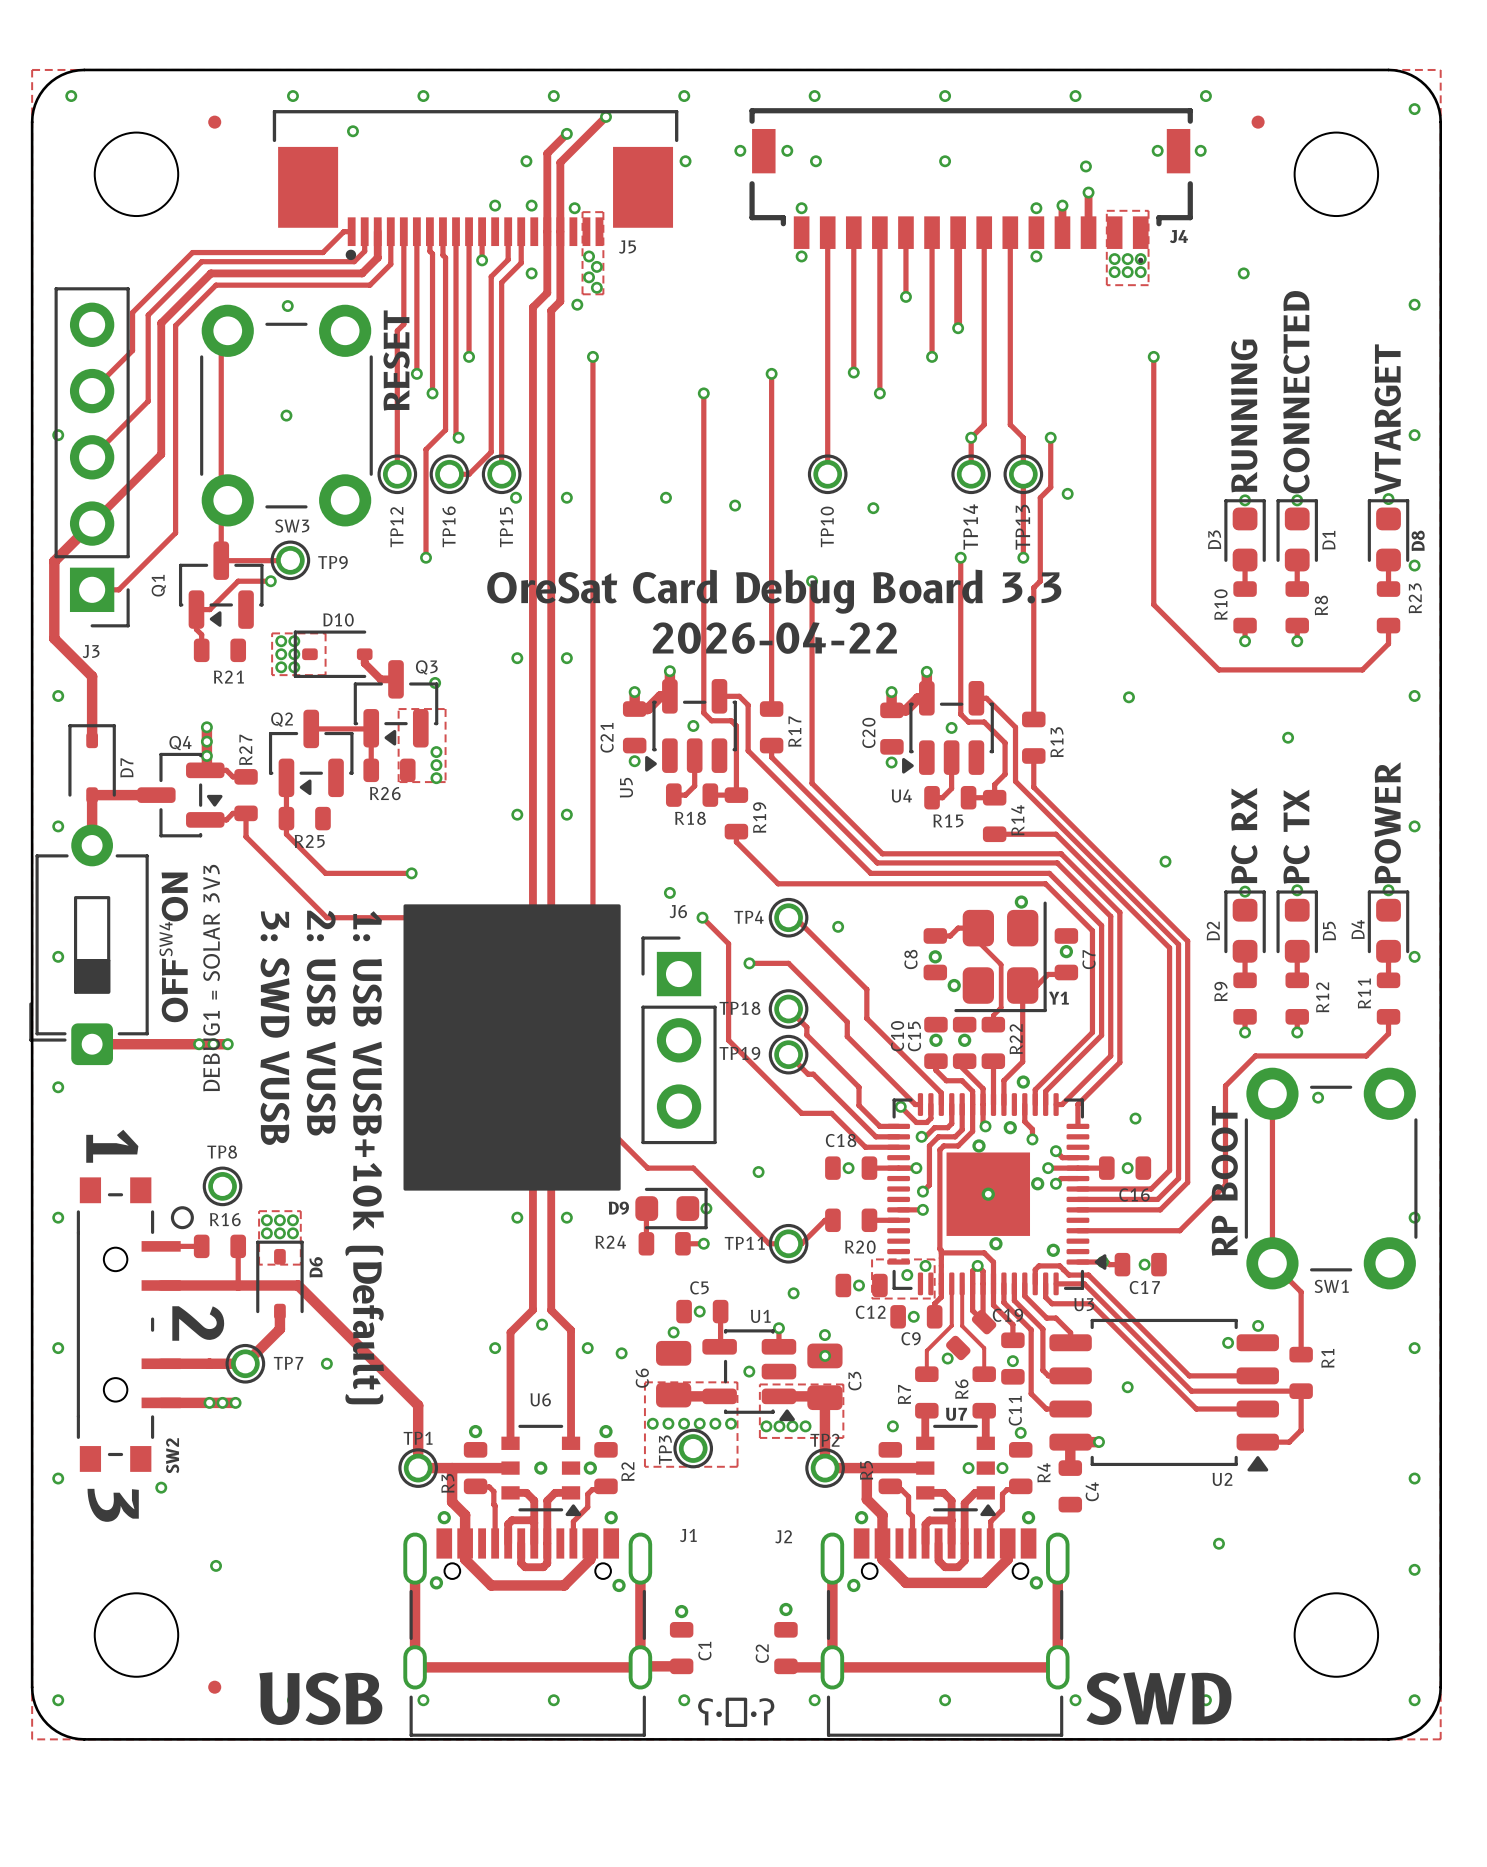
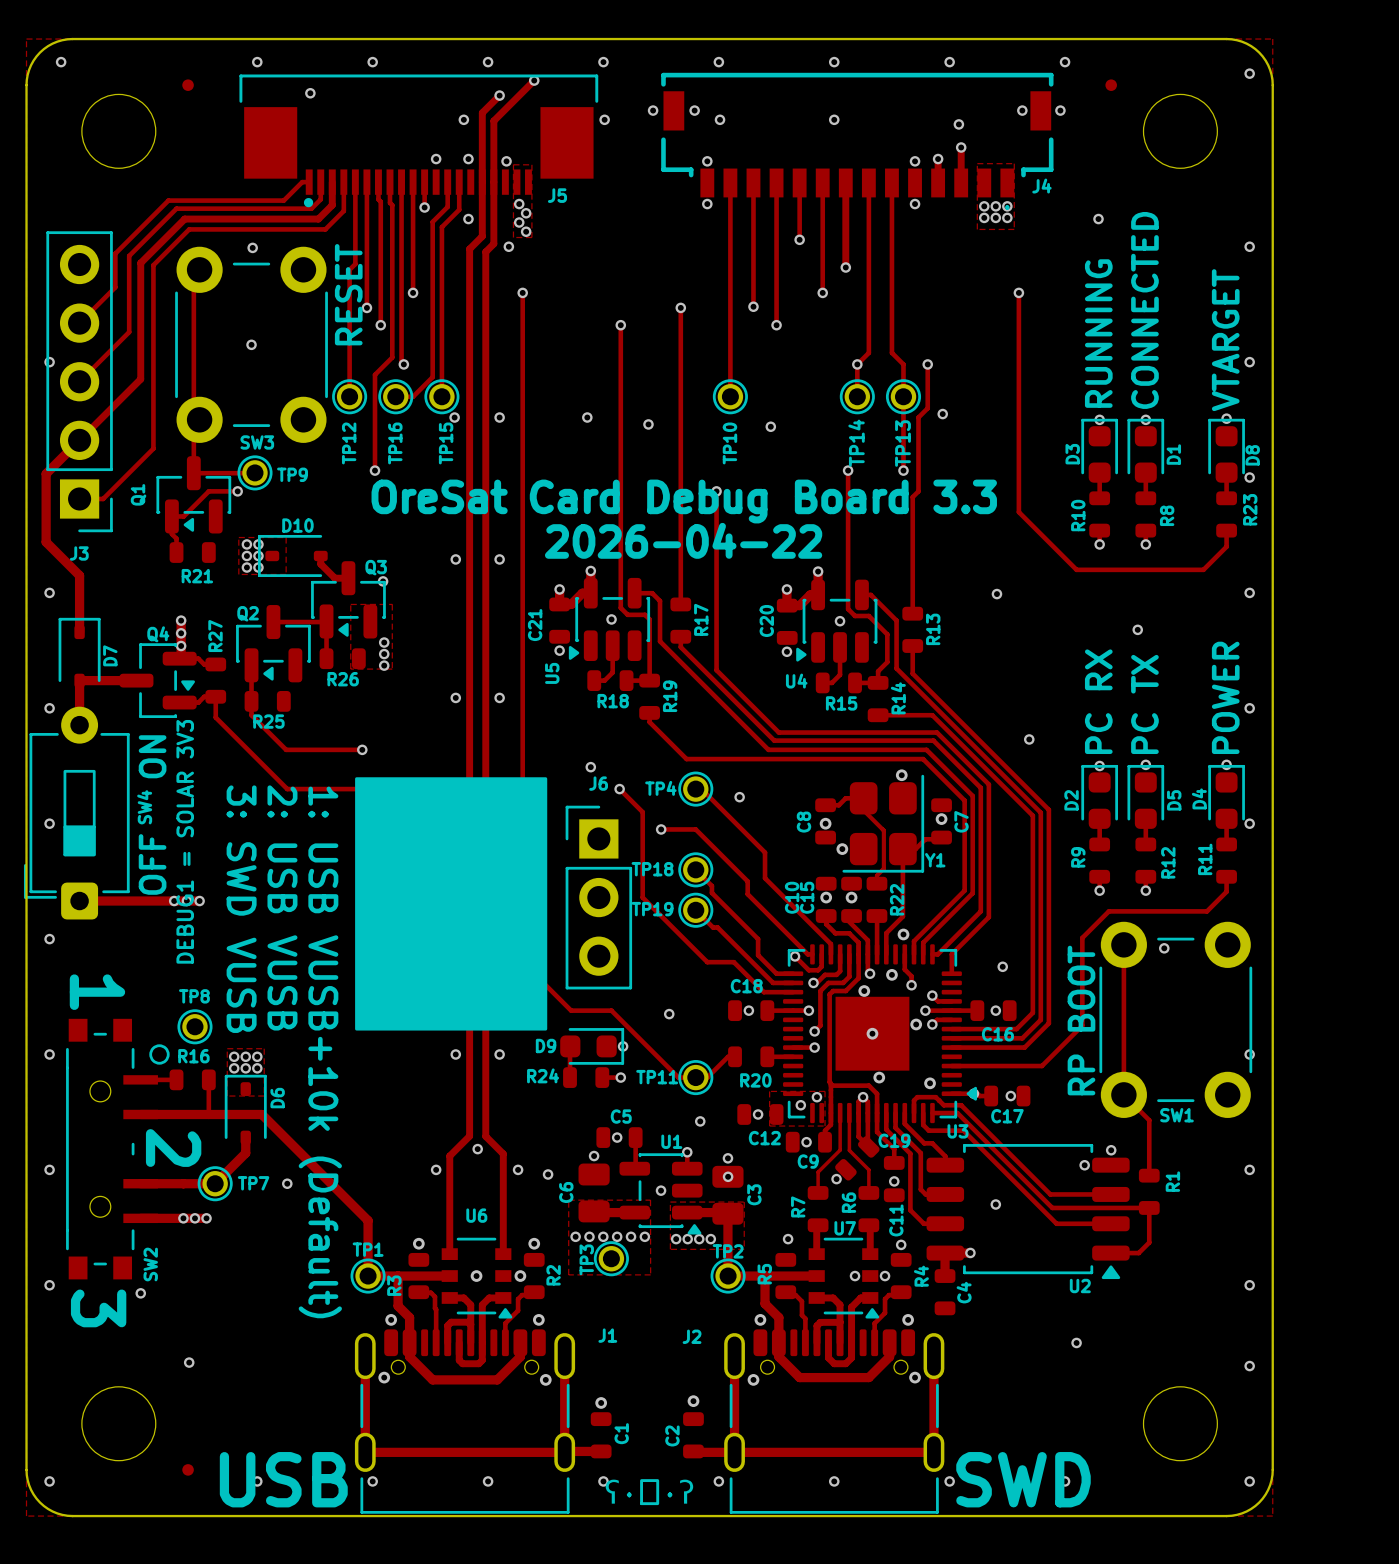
J1 footprint: [403, 1528, 653, 1737] -> [354, 1329, 576, 1514]
J2 footprint: [820, 1528, 1070, 1737] -> [724, 1329, 945, 1514]

